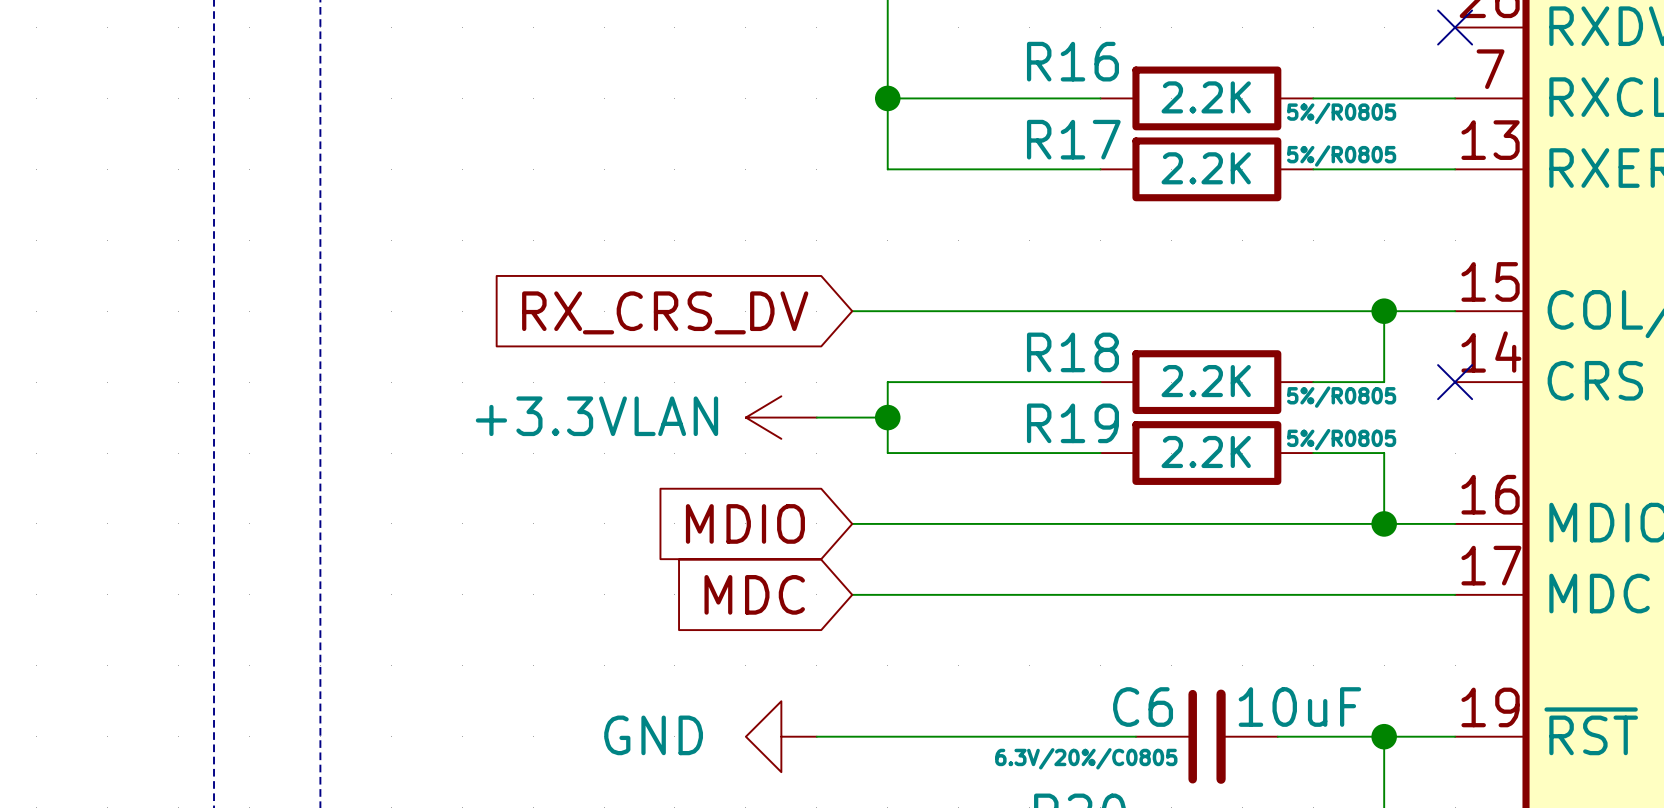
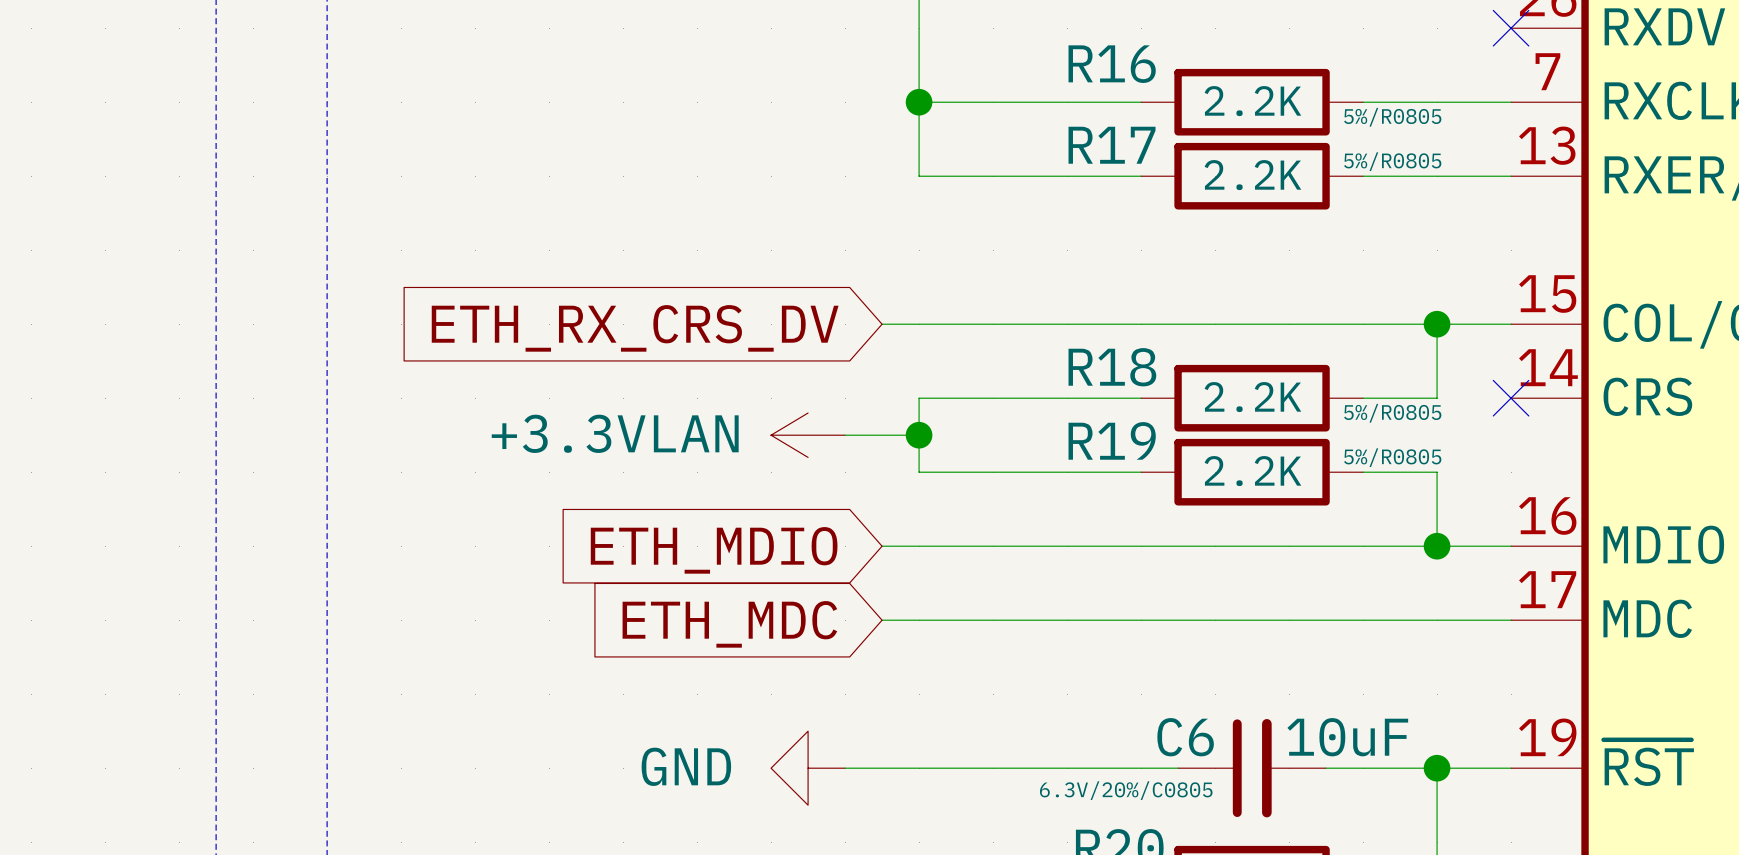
global label: RX_CRS_DV (665, 312) -> ETH_RX_CRS_DV (635, 328)
global label: MDIO (745, 523) -> ETH_MDIO (714, 550)
global label: MDC (754, 594) -> ETH_MDC (729, 624)

